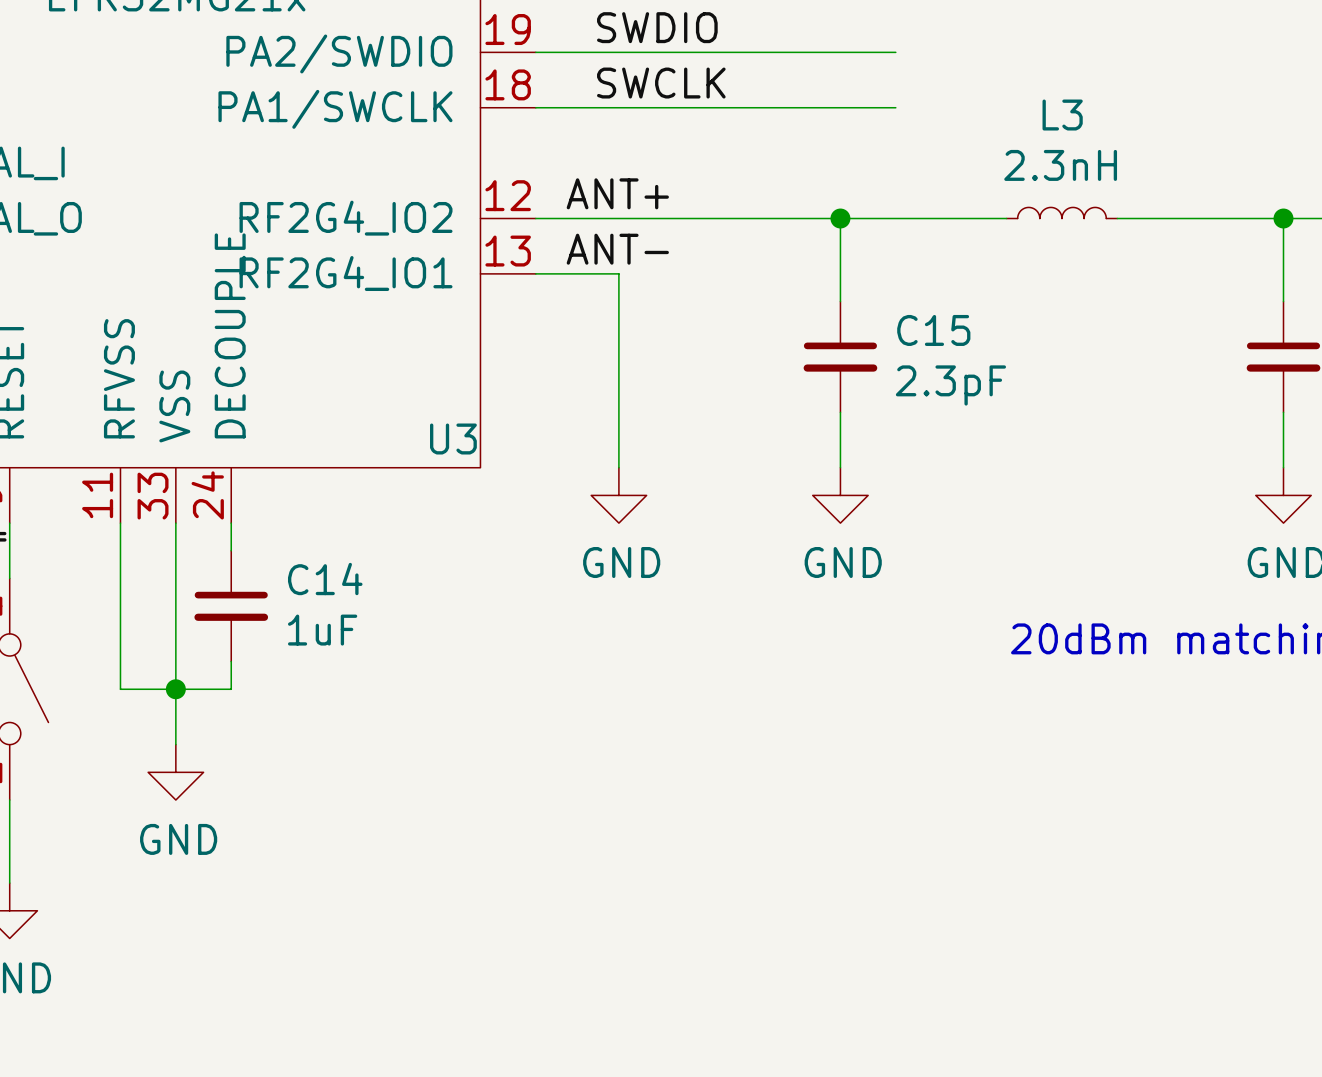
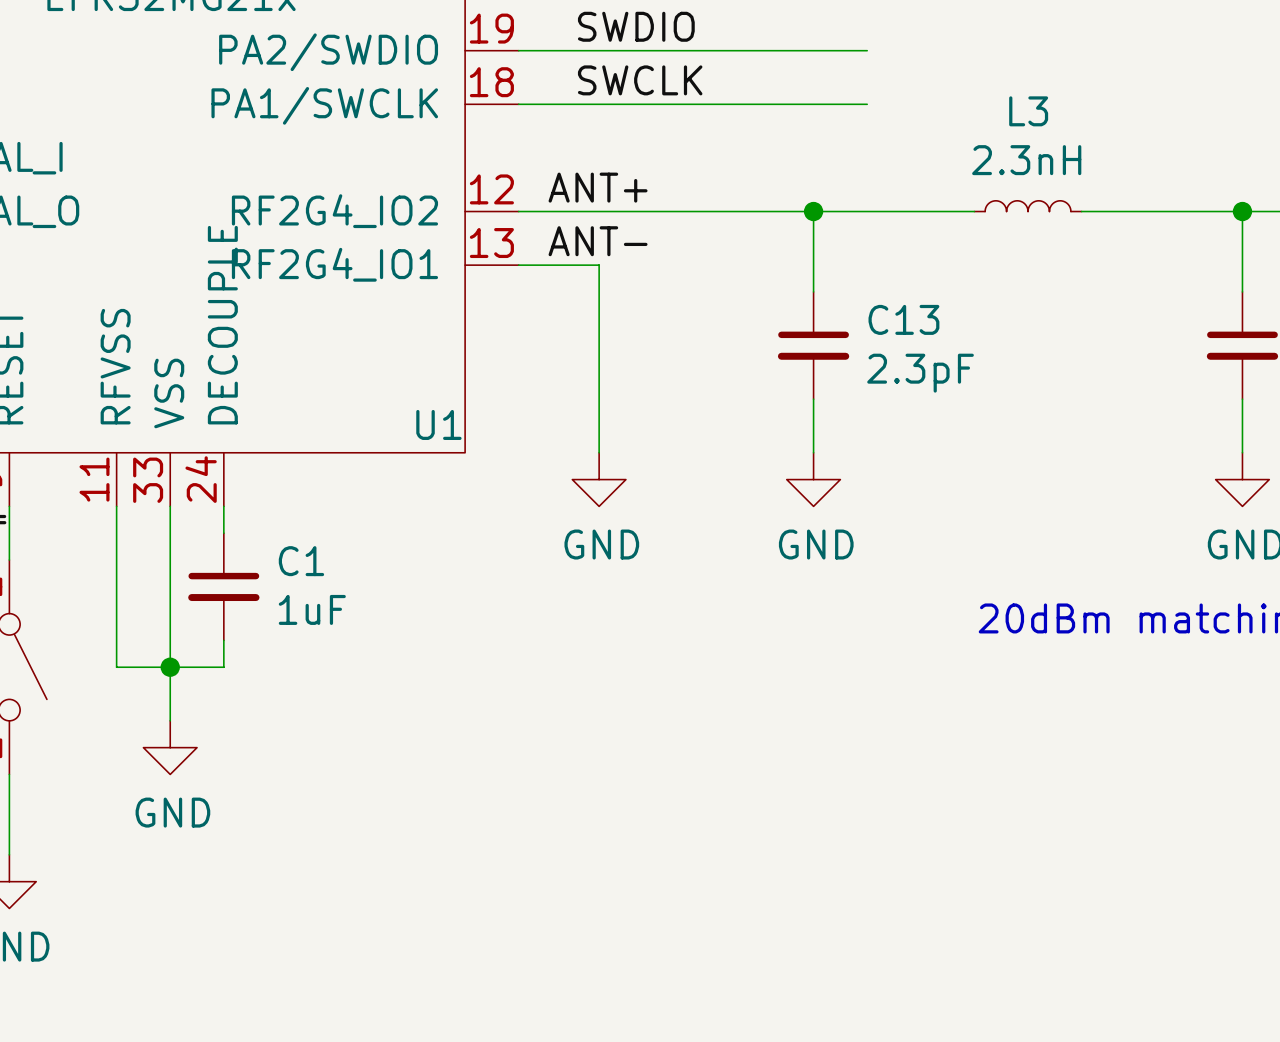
C15 name: C15 (933, 330) -> C13 (903, 319)
U3 name: U3 (453, 439) -> U1 (438, 424)
C14 name: C14 (325, 579) -> C1 (301, 561)

